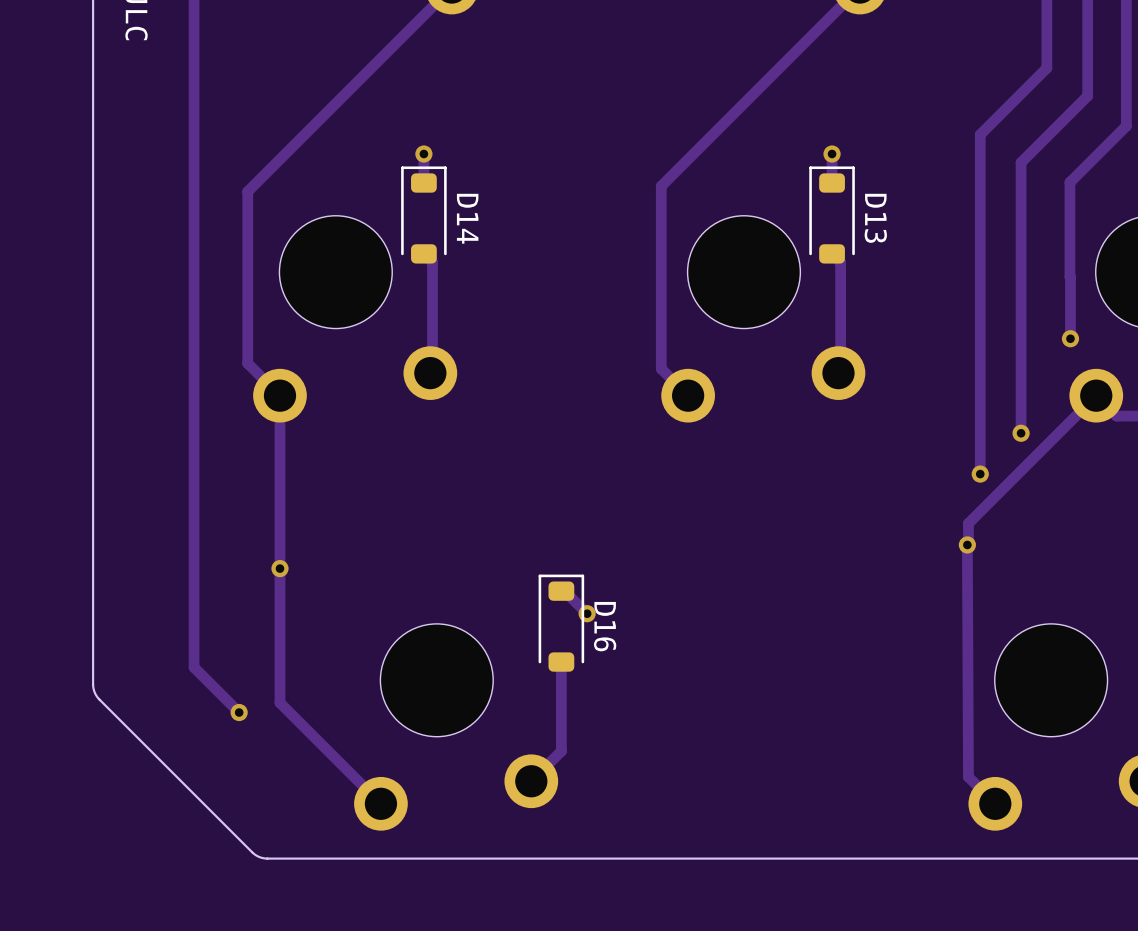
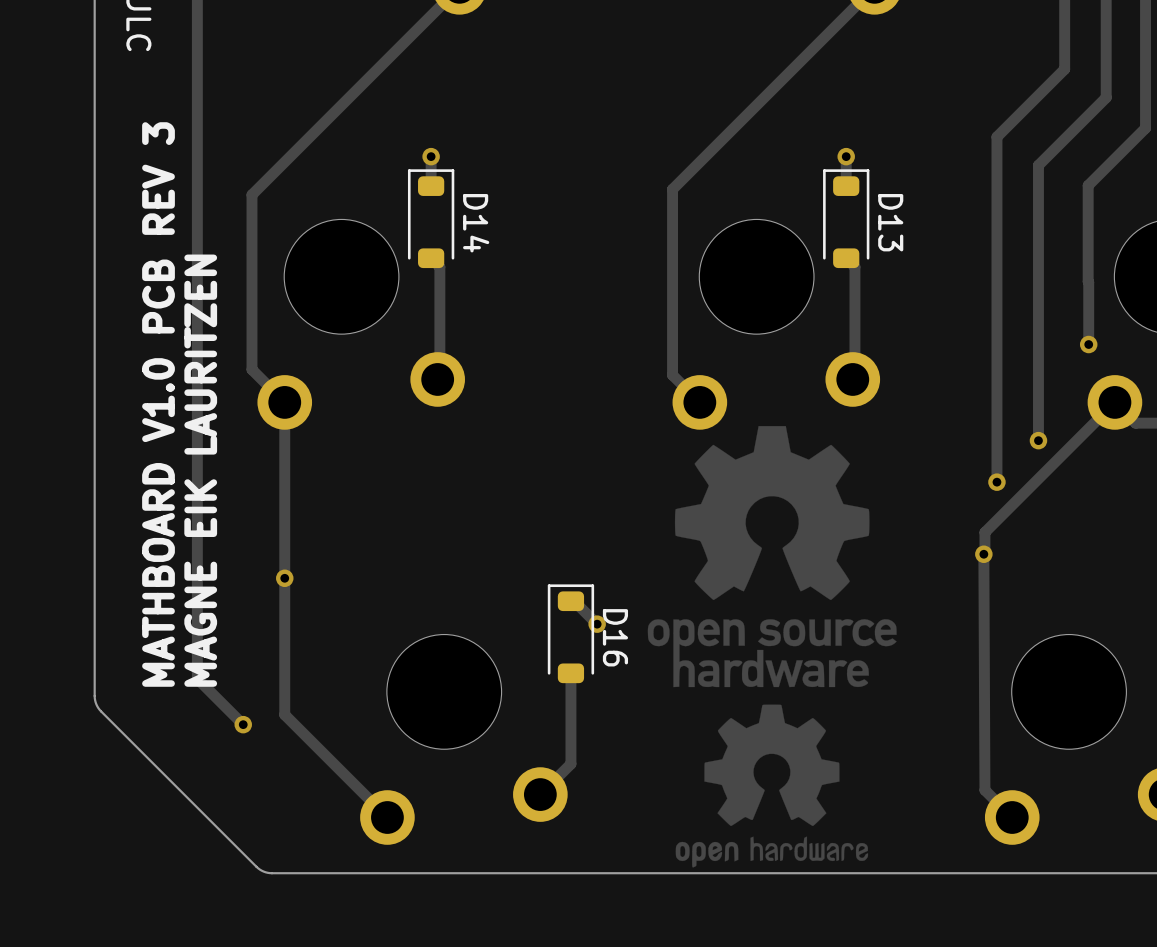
drawing: none -> [647, 426, 897, 868]
text: none -> MATHBOARD V1.0 PCB REV 3 (158, 404)
text: none -> MAGNE EIK LAURITZEN (200, 470)

